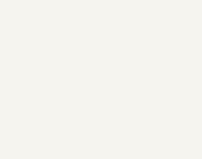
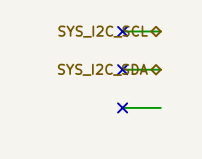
hierarchical label: none -> SYS_I2C_SCL (103, 31)
wire: none -> (122, 31) (160, 31)
no-connect mark: none -> (122, 31)
hierarchical label: none -> SYS_I2C_SDA (102, 69)
wire: none -> (122, 69) (160, 69)
no-connect mark: none -> (122, 69)
wire: none -> (122, 107) (160, 107)
no-connect mark: none -> (122, 107)

